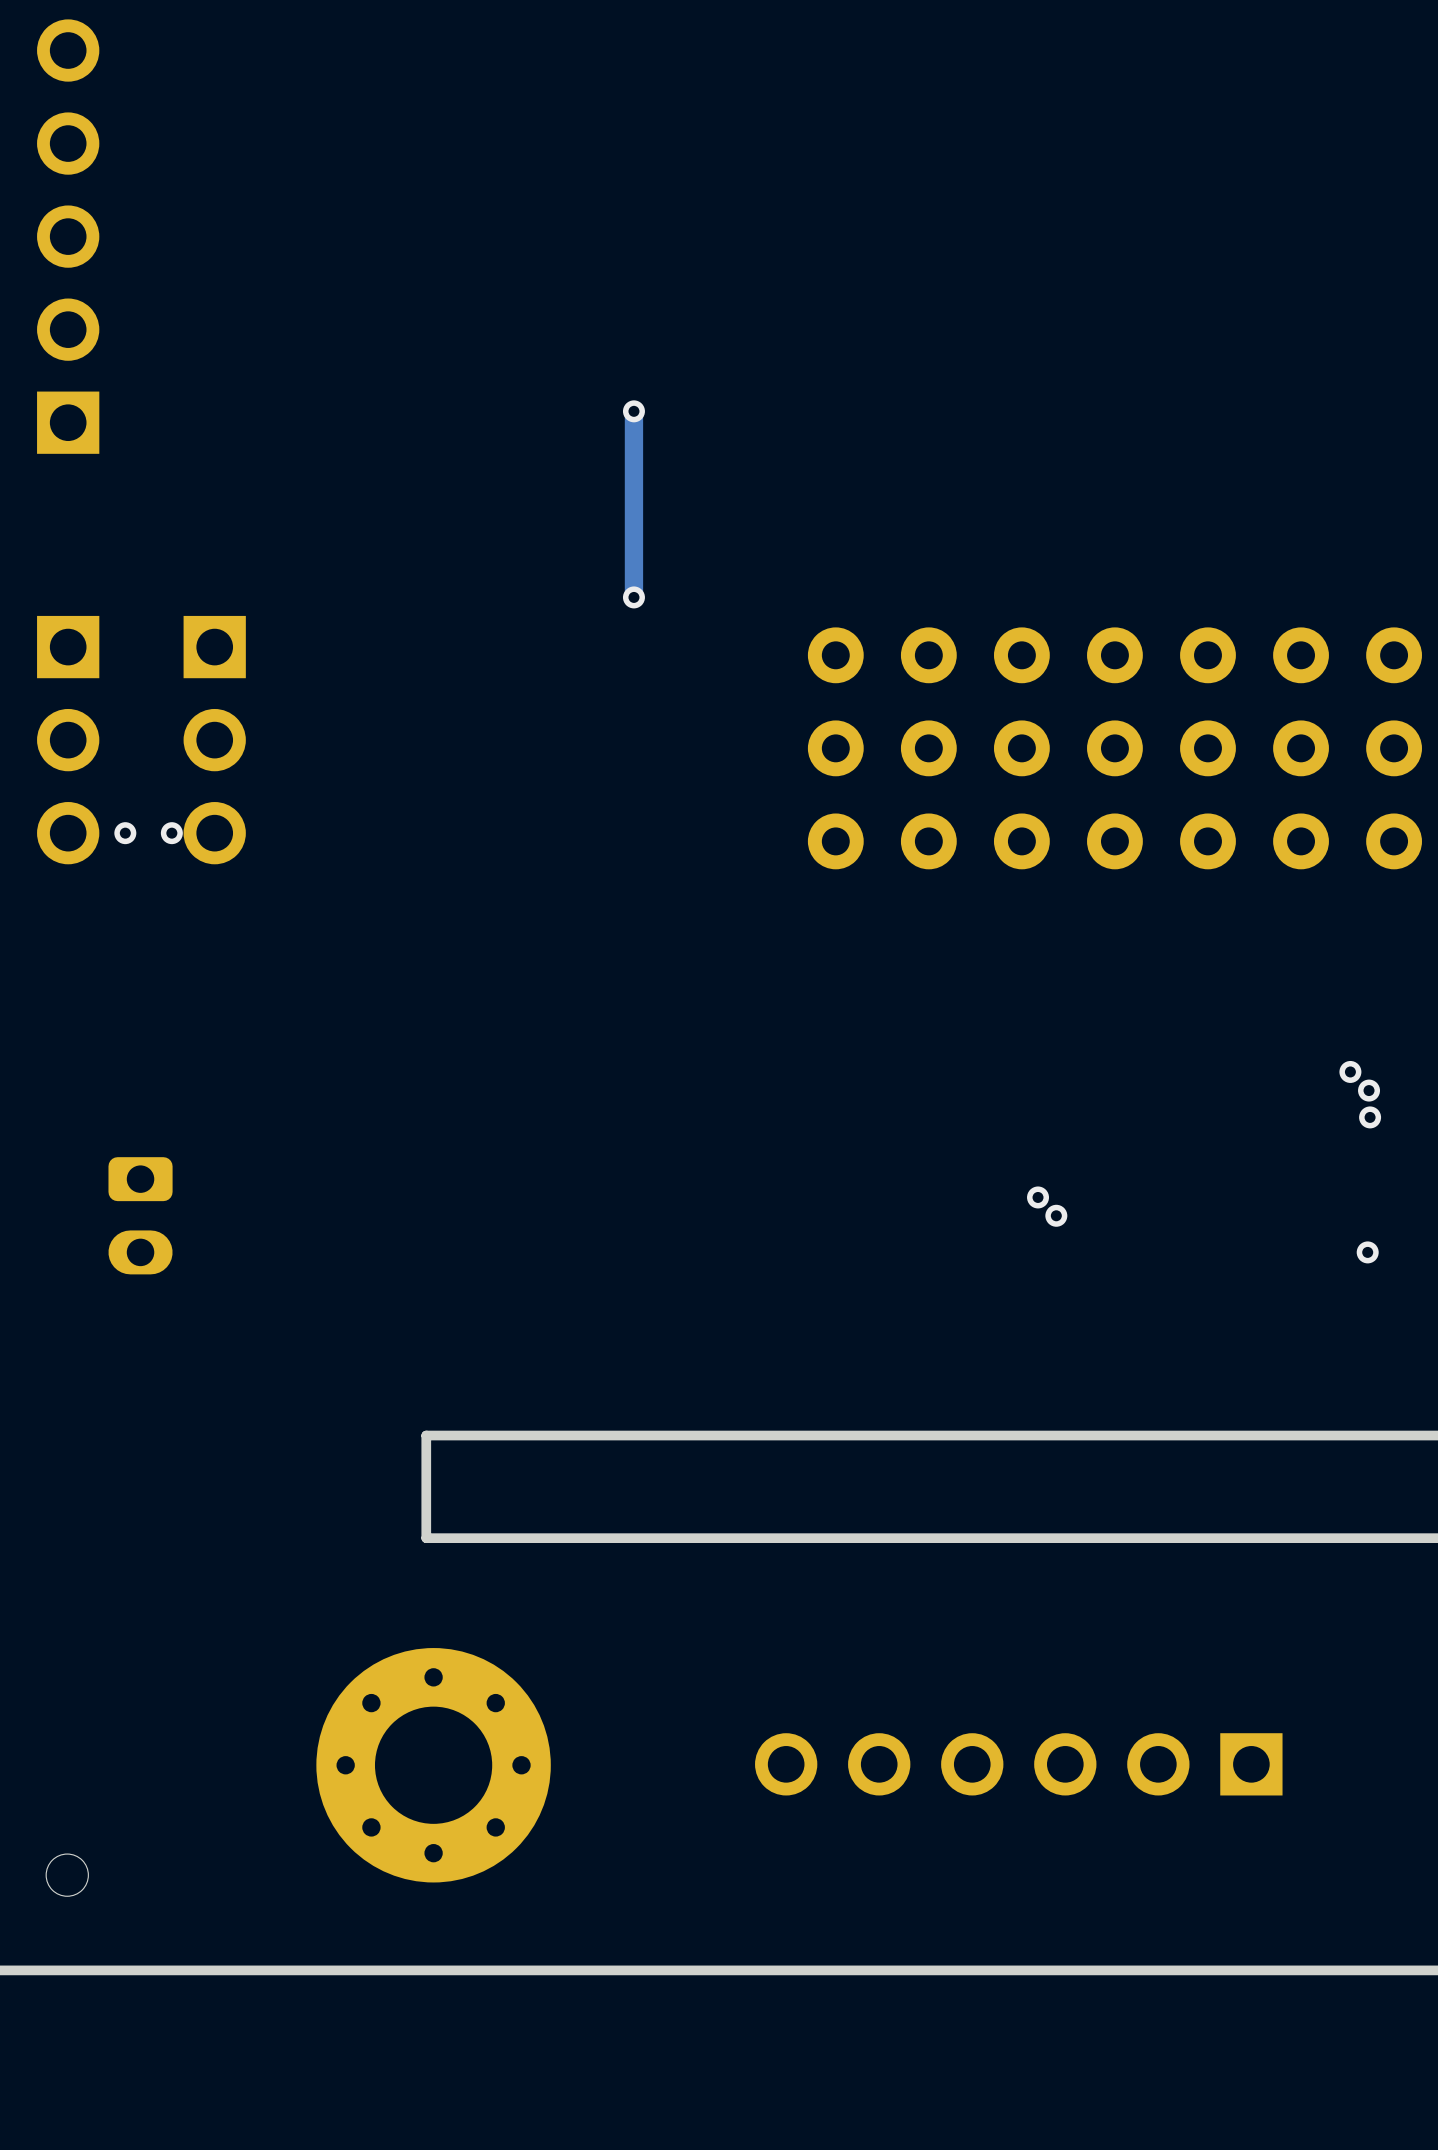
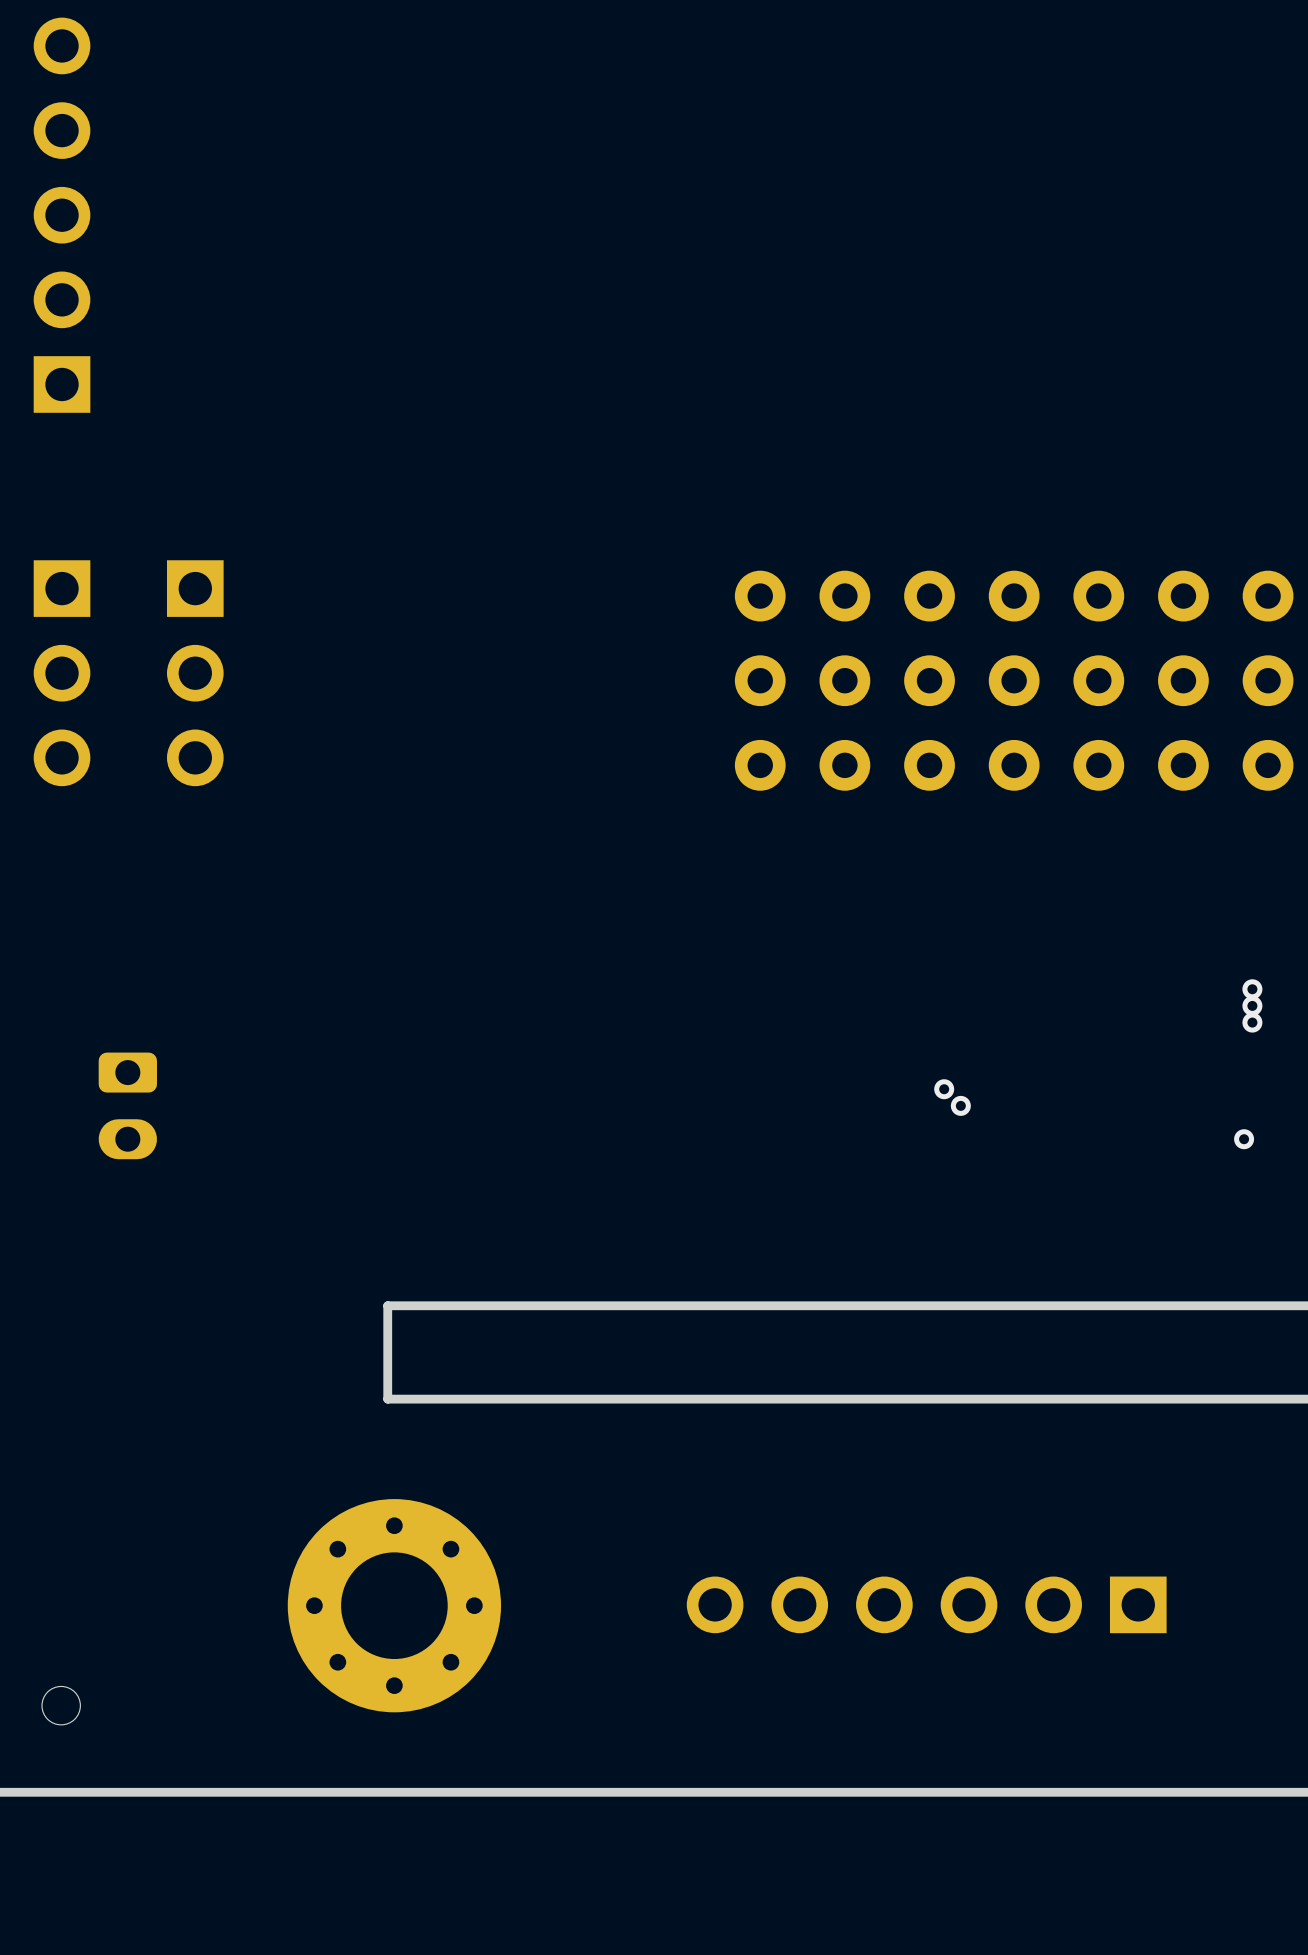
track: (633, 411) (633, 597) -> none
via: (633, 411) -> none
via: (633, 597) -> none
via: (125, 833) -> none
via: (171, 833) -> none
via: (1350, 1071) -> none
via: none -> (1252, 989)
via: (1369, 1090) -> none
via: none -> (1252, 1005)
via: (1370, 1117) -> none
via: none -> (1252, 1022)

